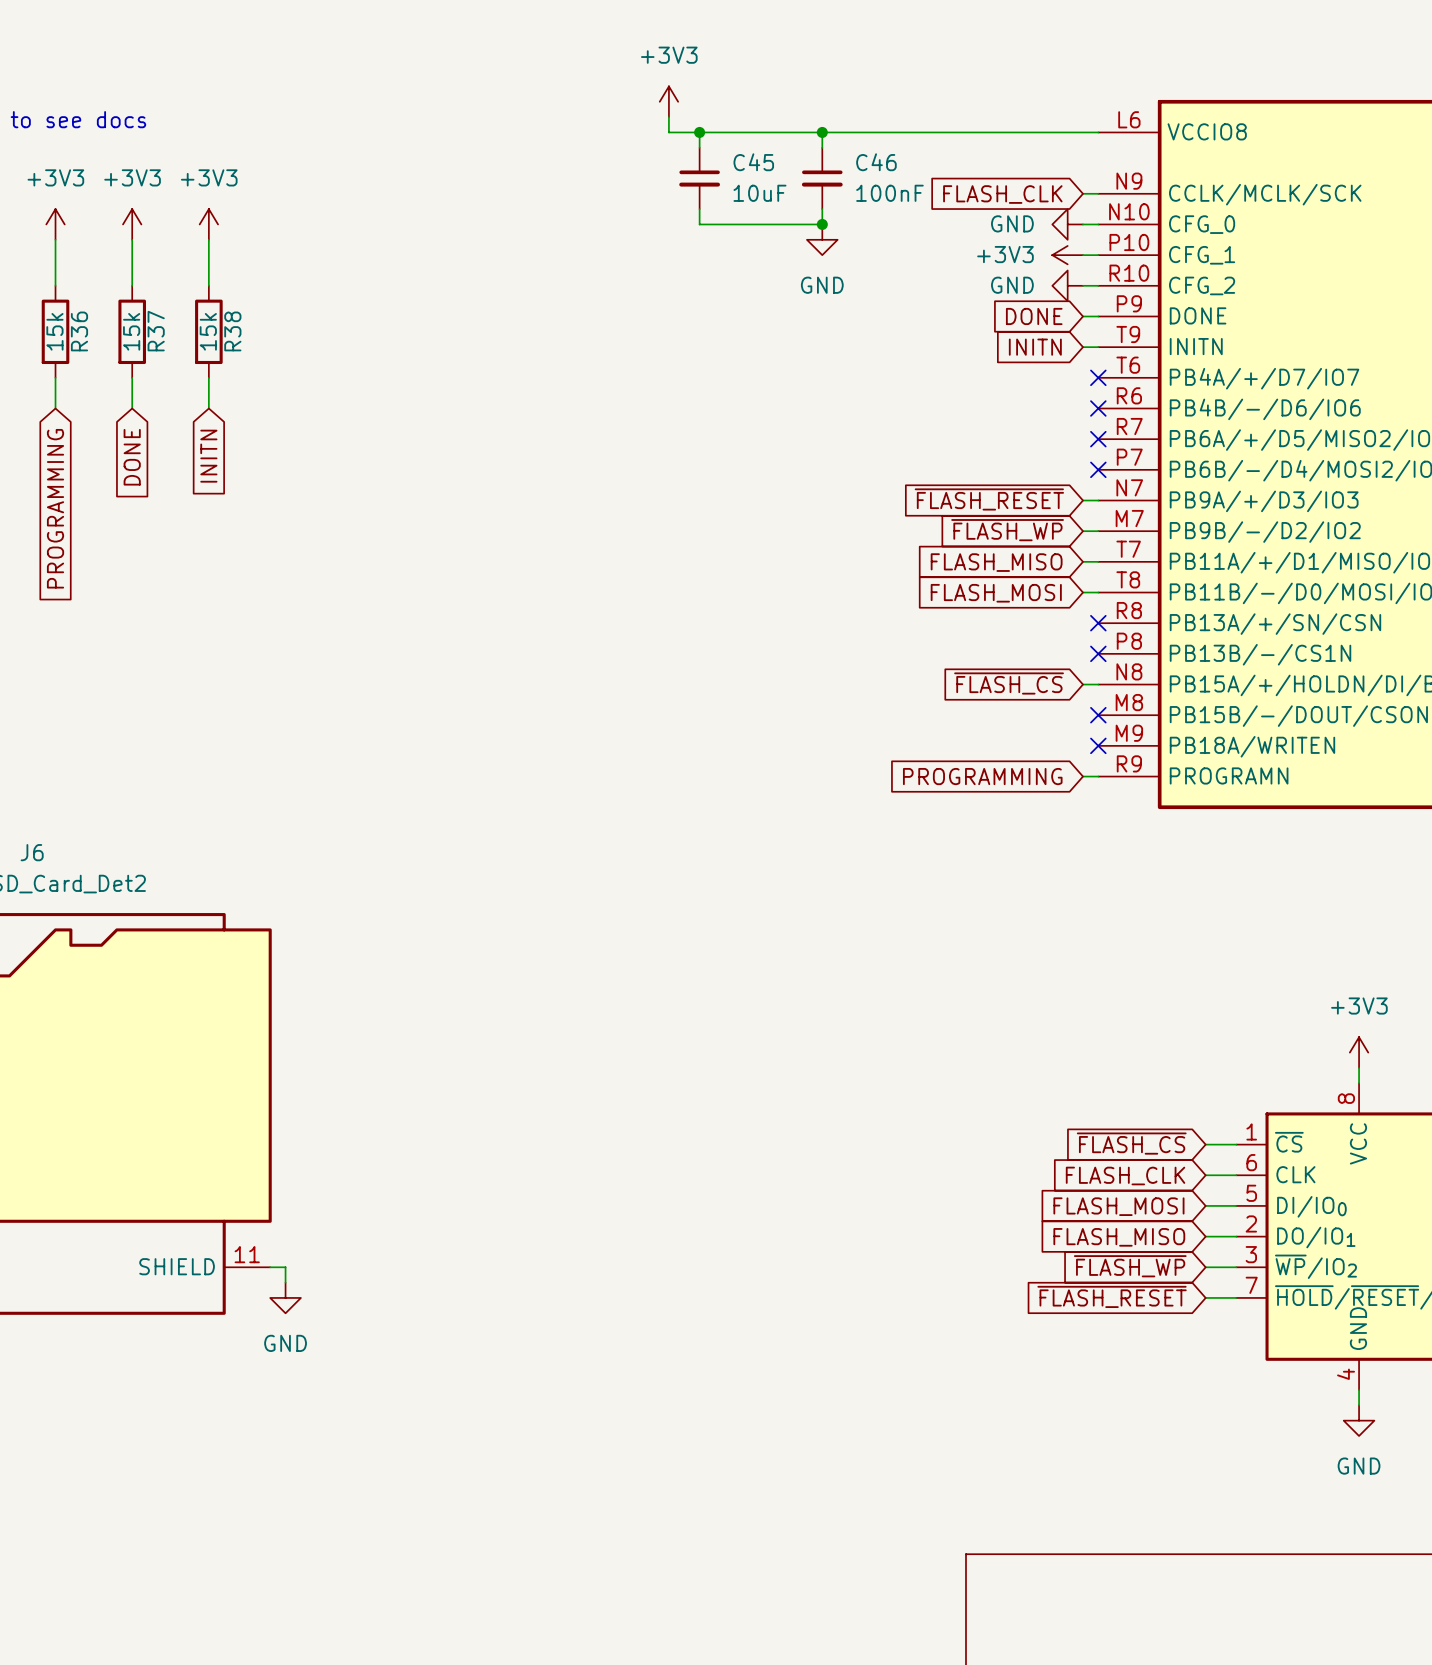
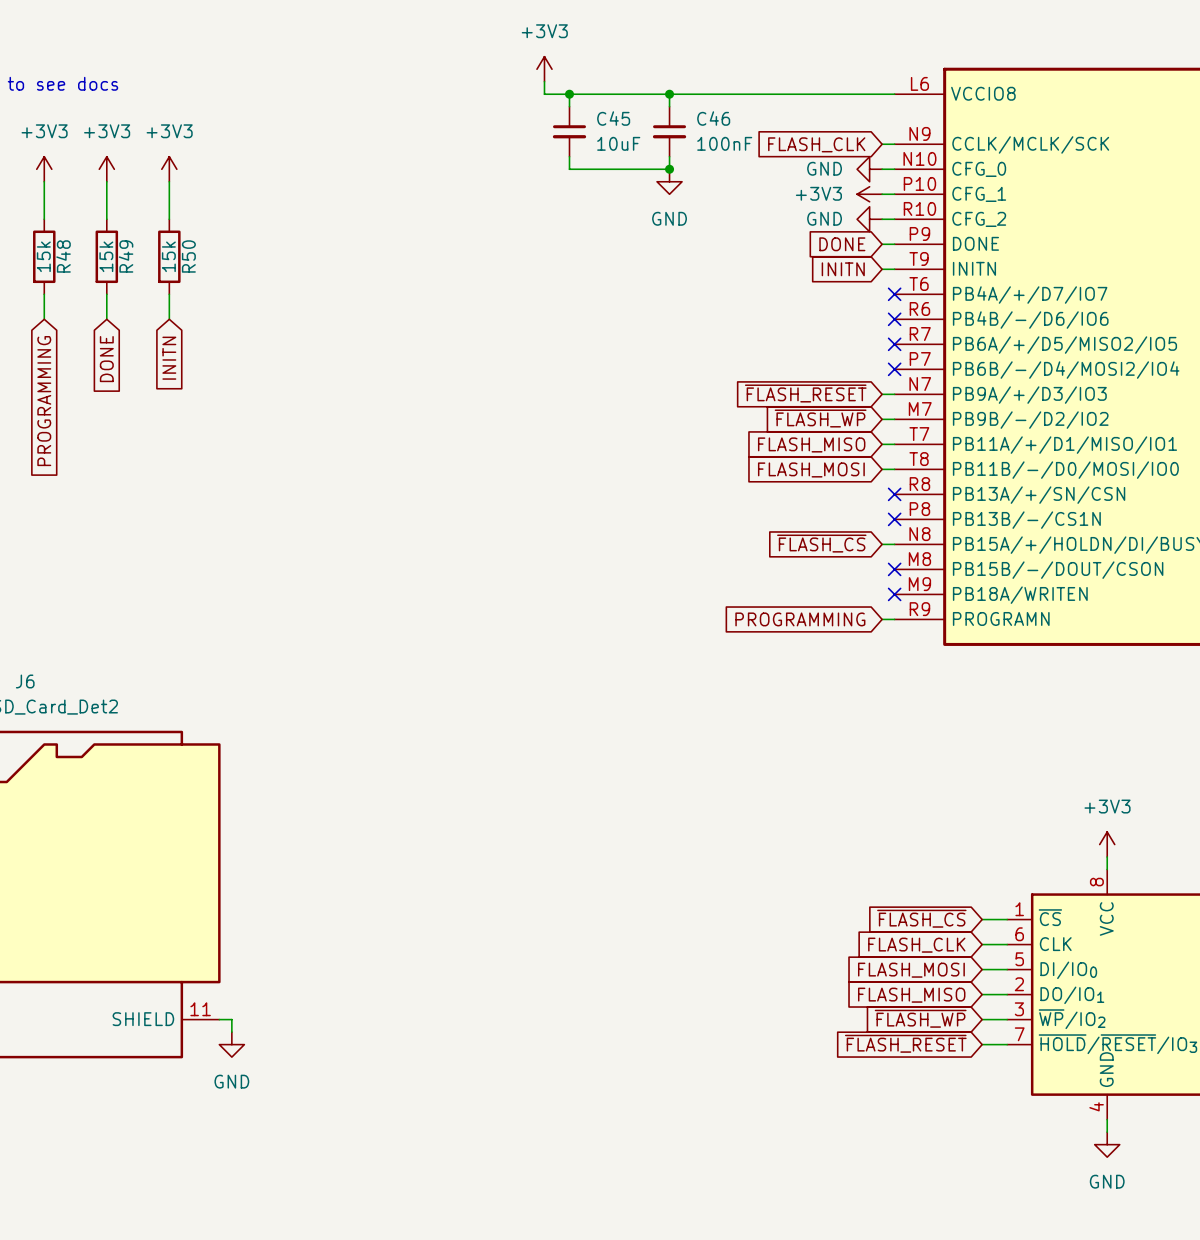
R36 name: R36 (79, 331) -> R48 (63, 256)
R37 name: R37 (156, 331) -> R49 (126, 256)
R38 name: R38 (232, 331) -> R50 (188, 256)

